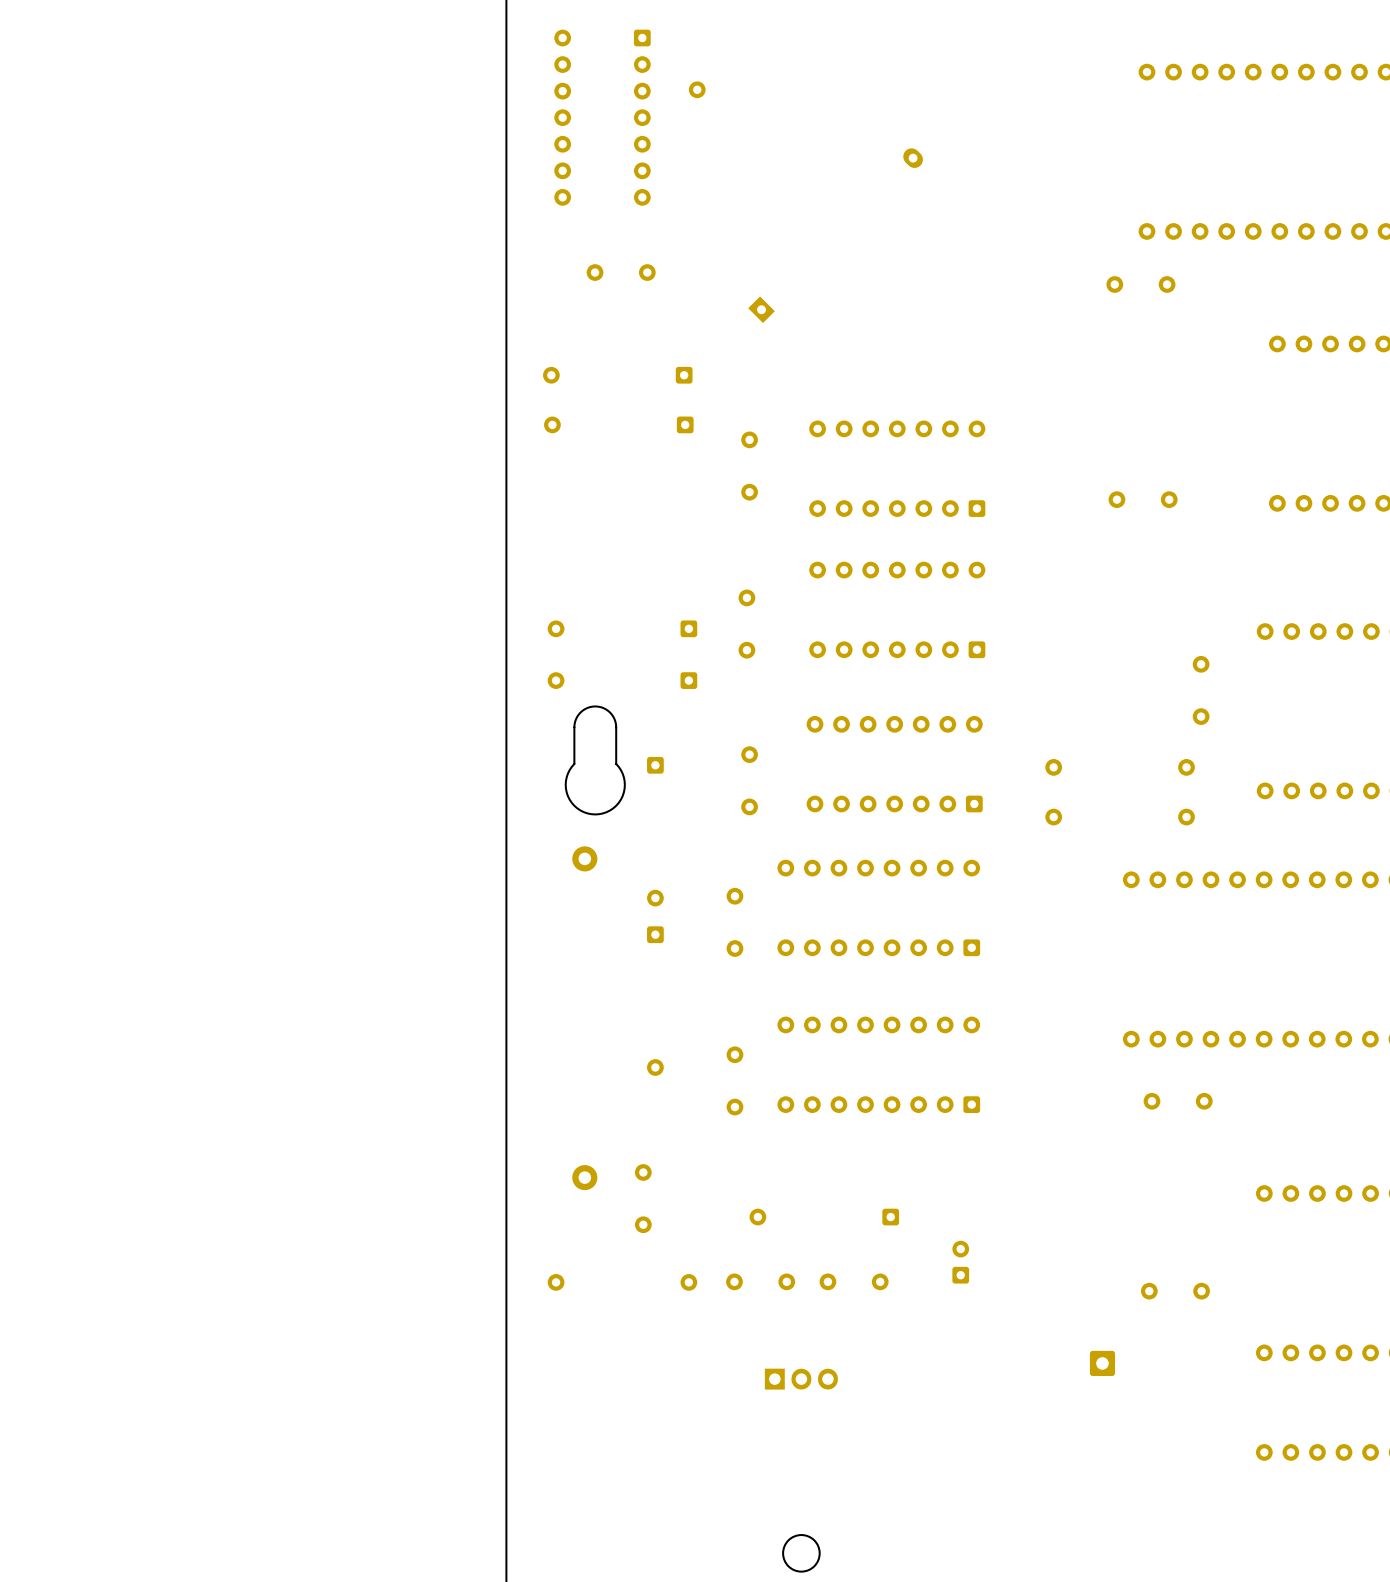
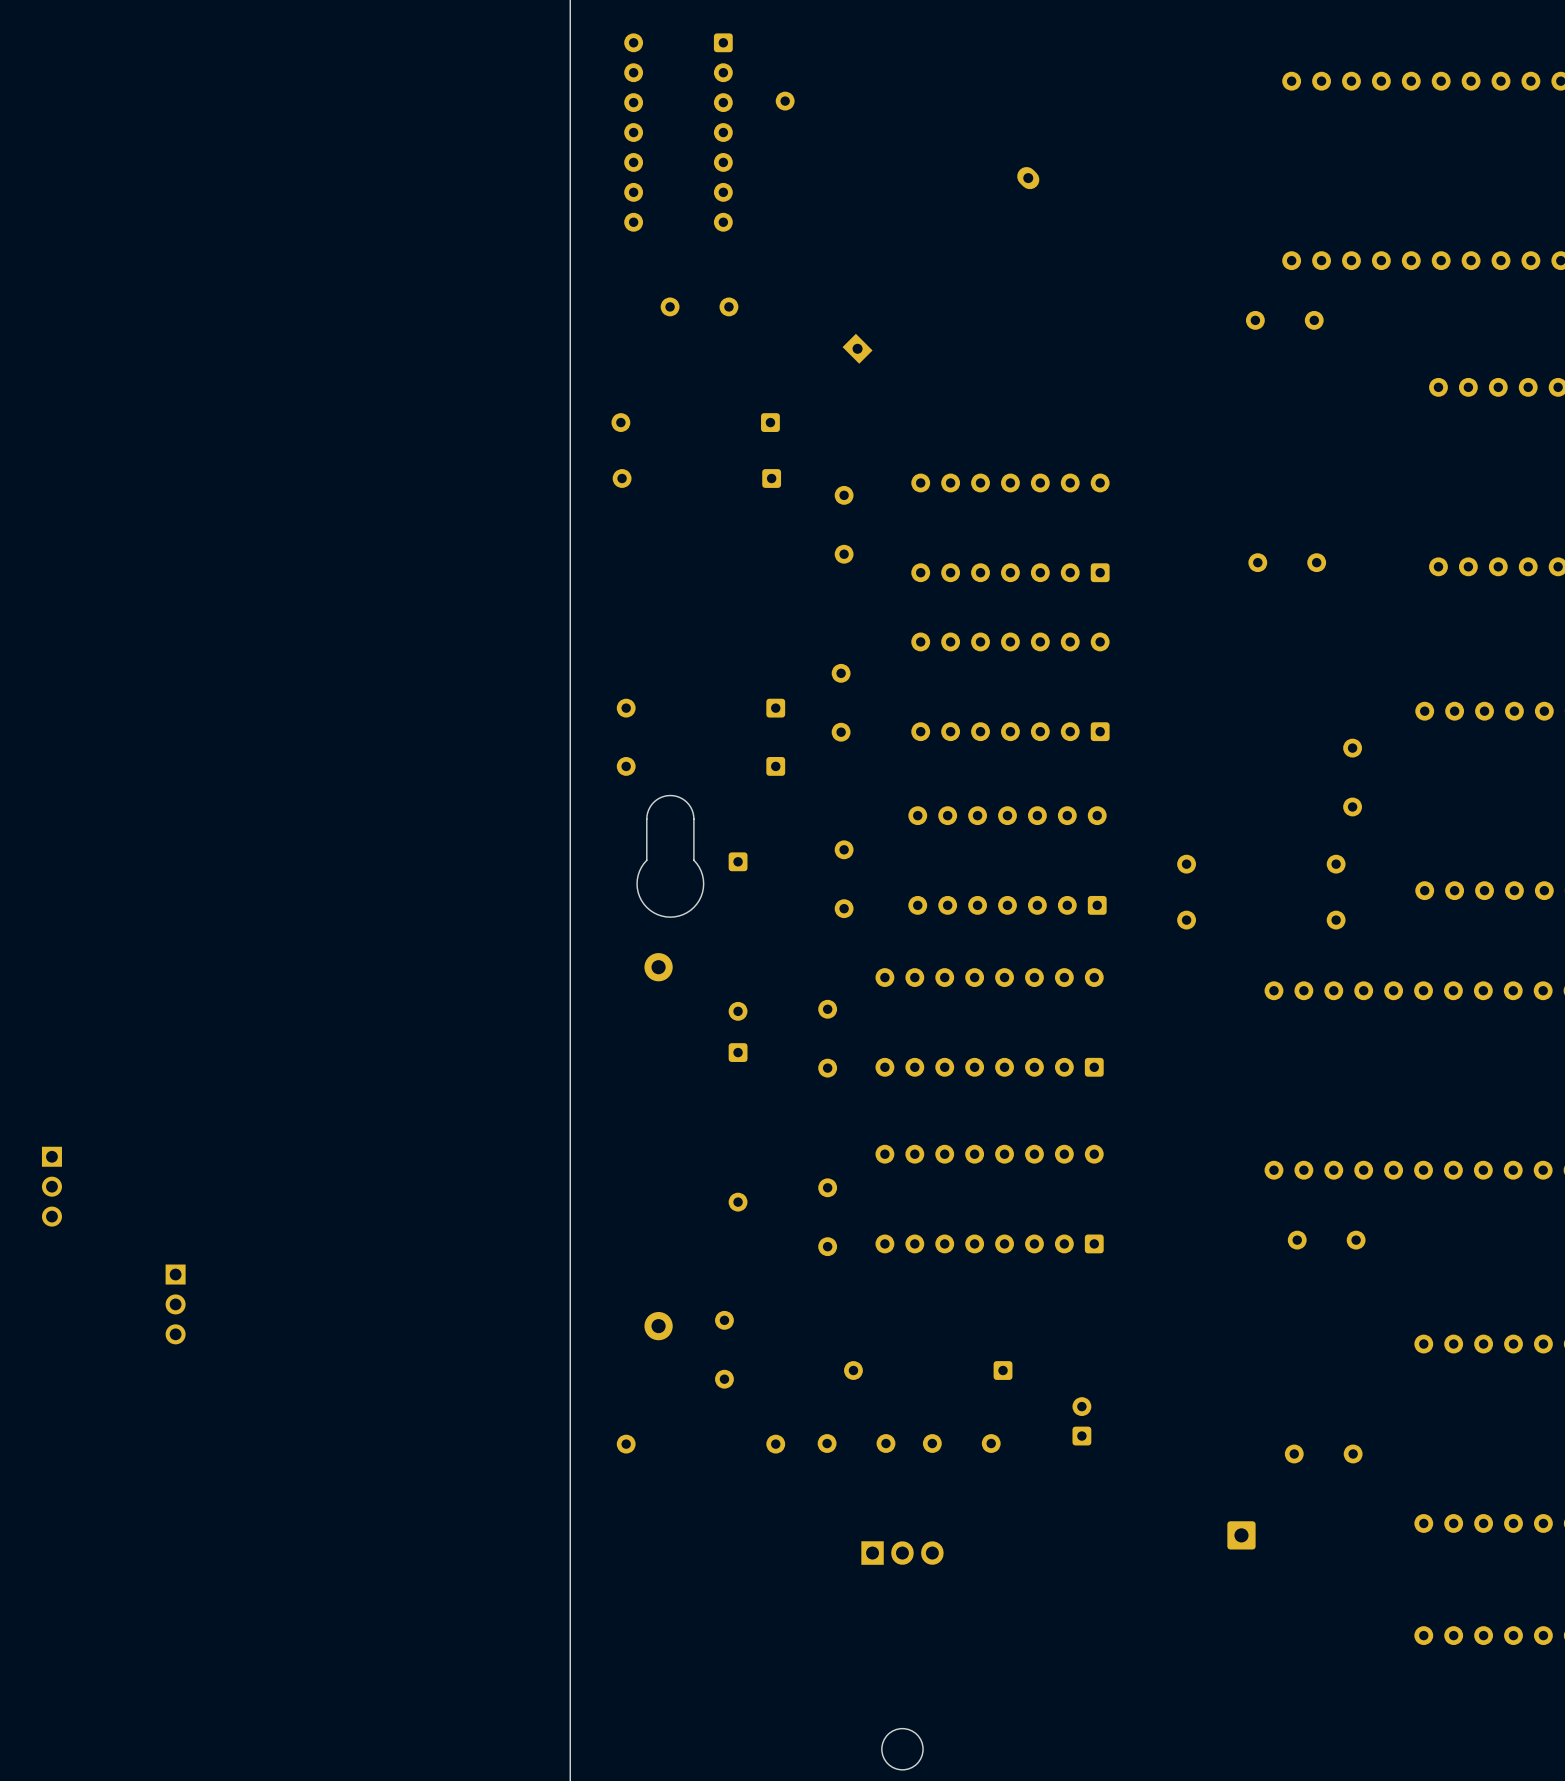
part: none -> (51, 1186)
part: none -> (175, 1304)

